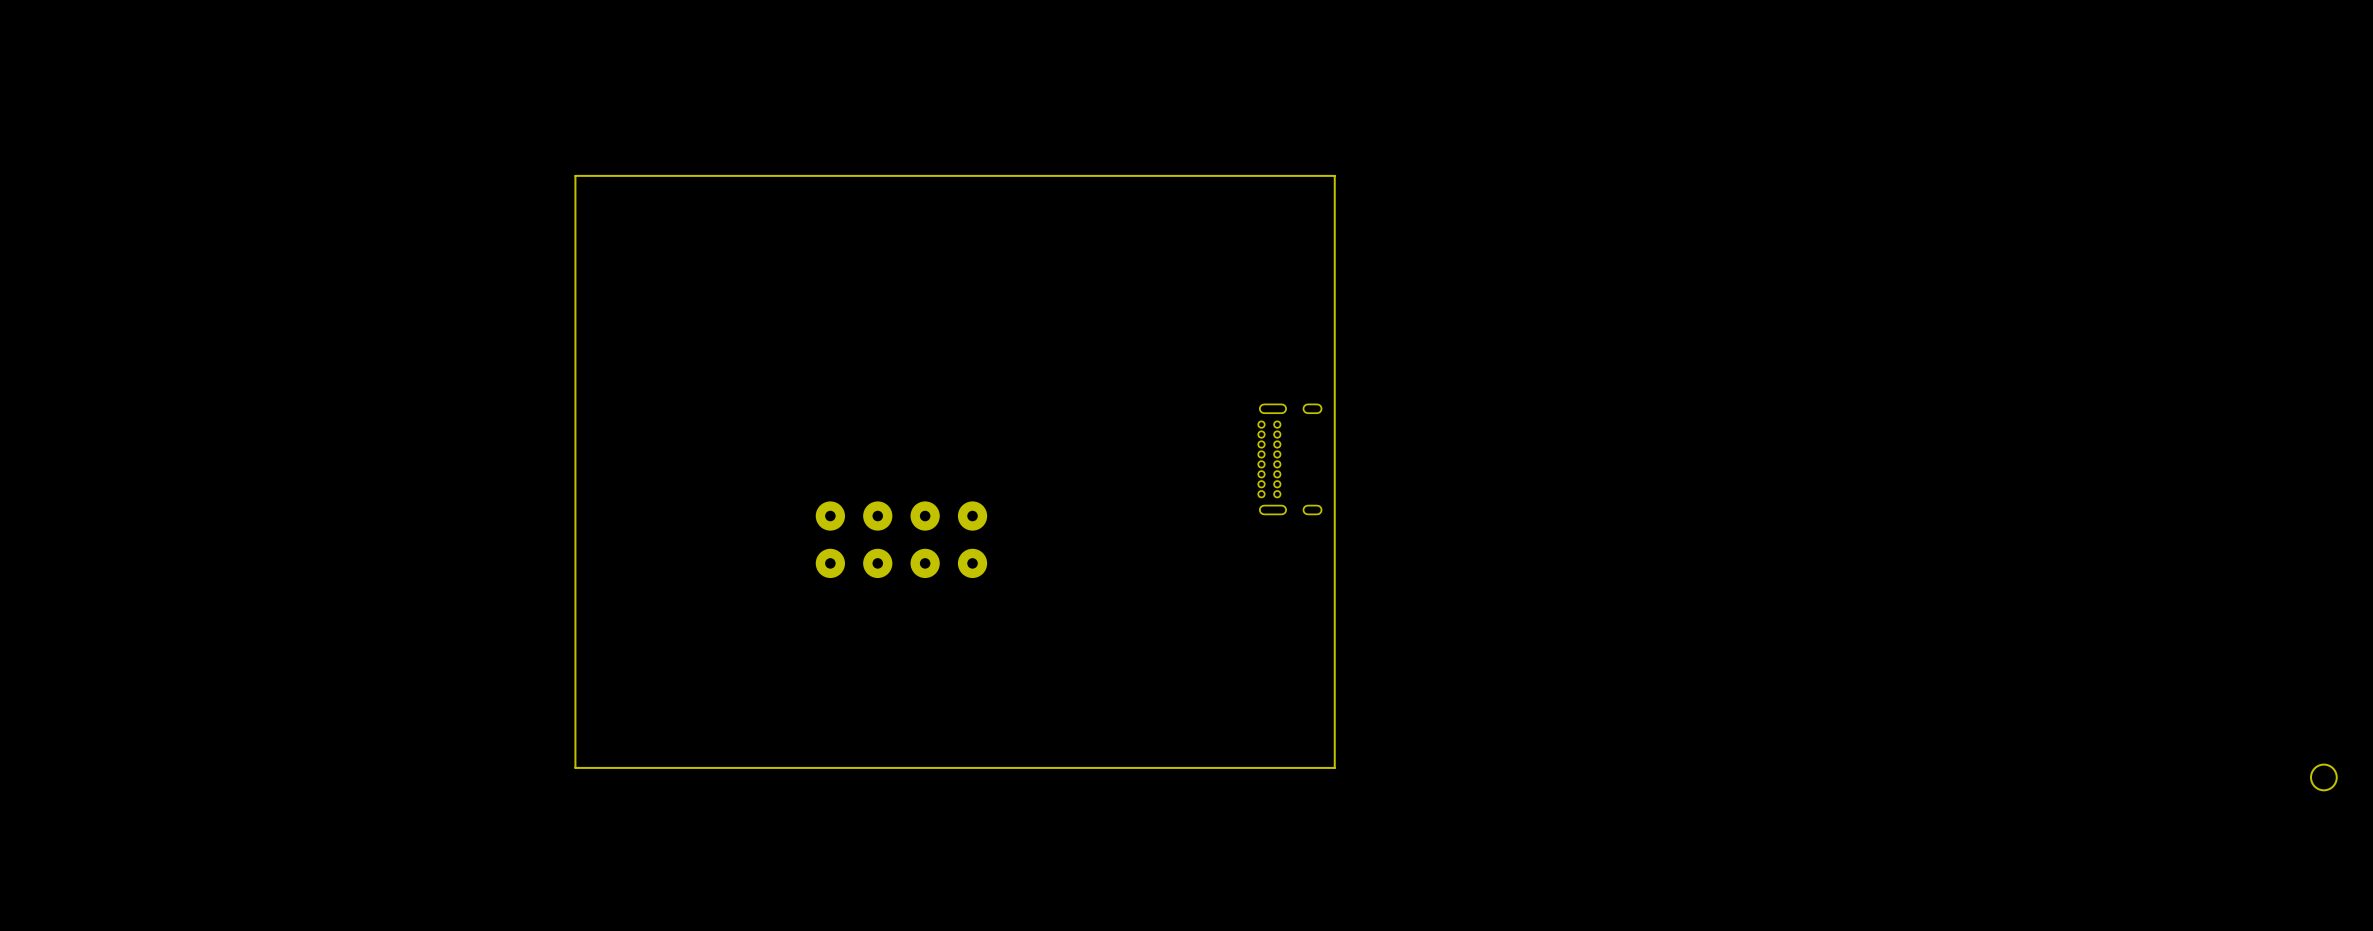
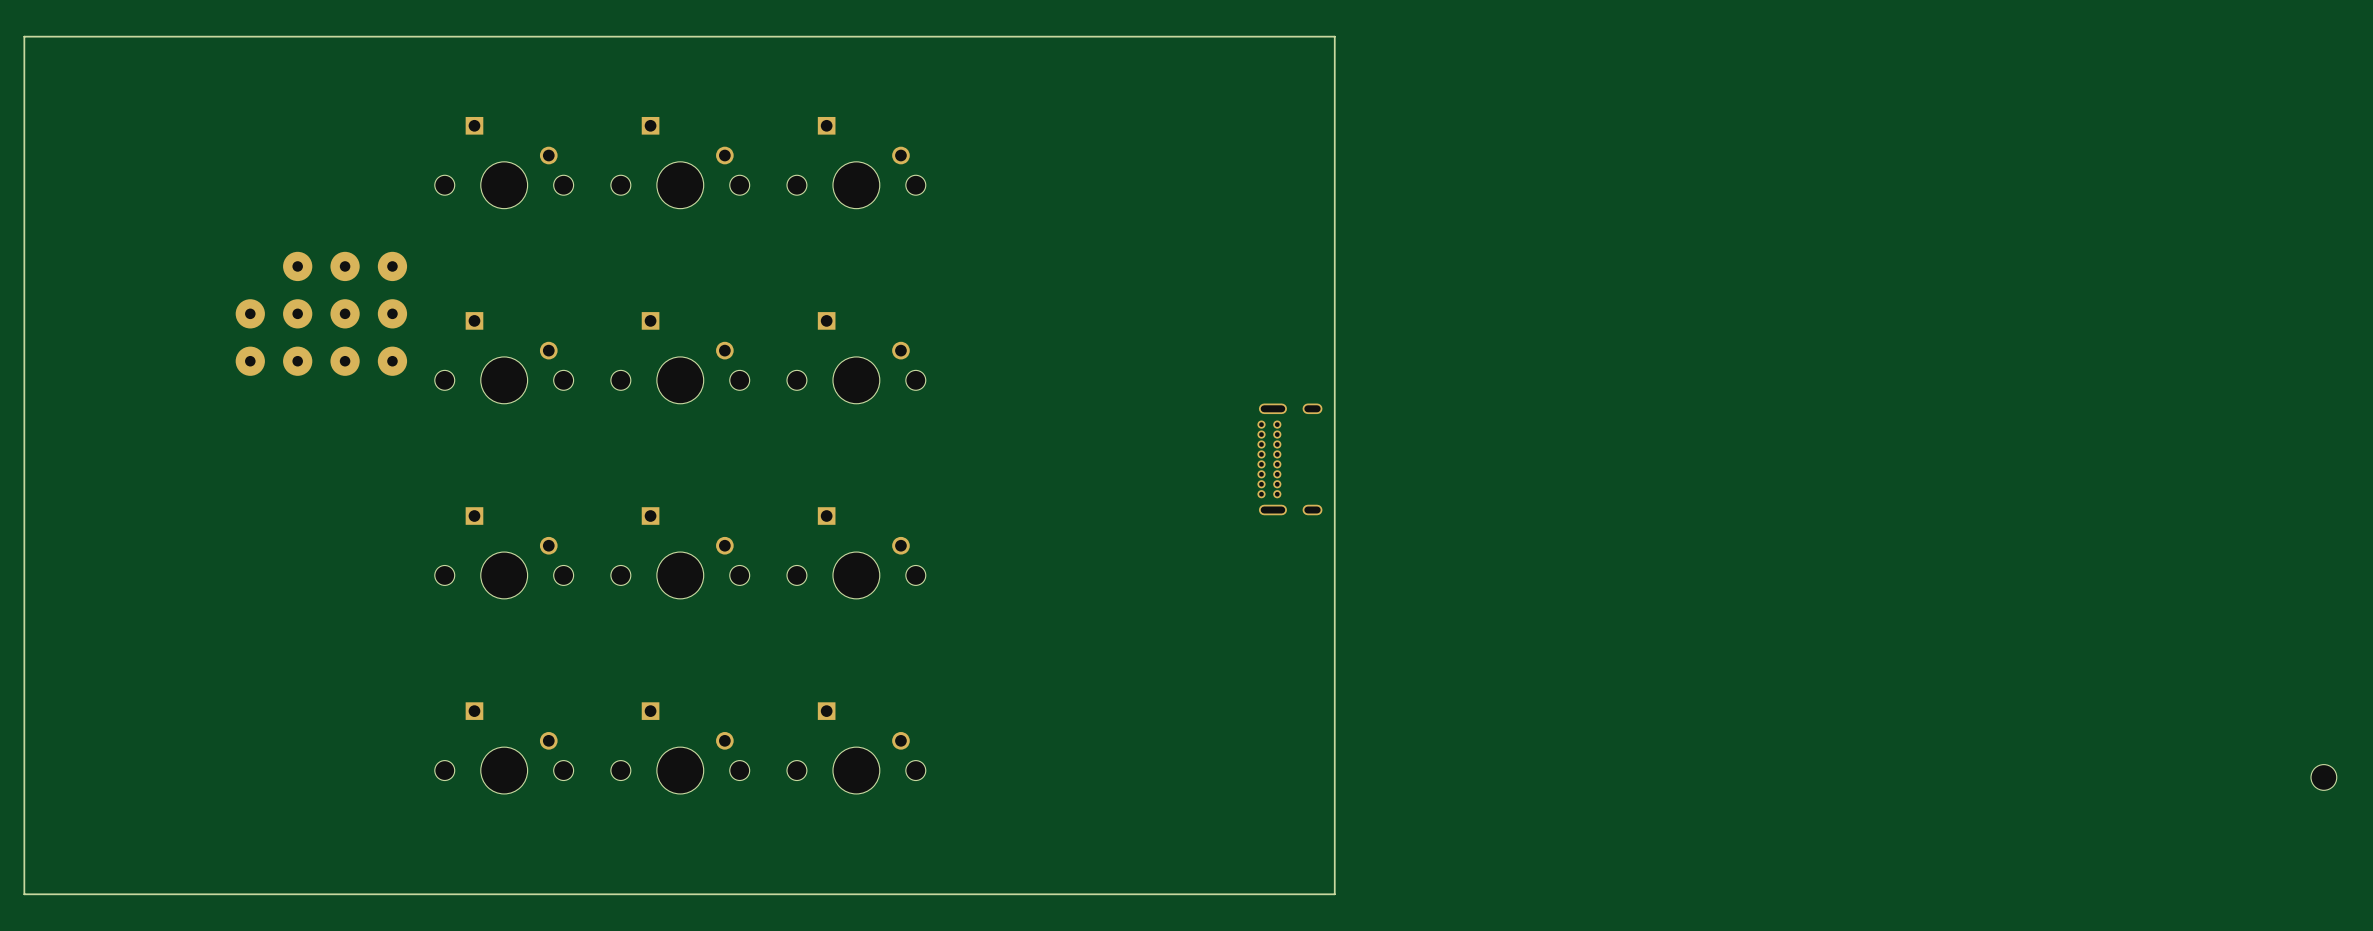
part: none -> (504, 162)
part: none -> (680, 162)
part: none -> (856, 162)
board edge: (1334, 175) (575, 175) (575, 767) (1334, 767) -> (1334, 175) (1334, 36) (24, 36) (24, 894) (1334, 894) (1334, 767)
part: none -> (297, 266)
part: none -> (345, 266)
part: none -> (392, 266)
part: none -> (250, 313)
part: none -> (297, 313)
part: none -> (345, 313)
part: none -> (392, 313)
part: none -> (504, 357)
part: none -> (680, 357)
part: none -> (856, 357)
part: none -> (250, 361)
part: none -> (297, 361)
part: none -> (345, 361)
part: none -> (392, 361)
part: (830, 516) -> none
part: (877, 516) -> none
part: (925, 516) -> none
part: (972, 516) -> none
part: none -> (504, 553)
part: none -> (680, 553)
part: none -> (856, 553)
part: (830, 563) -> none
part: (877, 563) -> none
part: (925, 563) -> none
part: (972, 563) -> none
part: none -> (504, 748)
part: none -> (680, 748)
part: none -> (856, 748)

